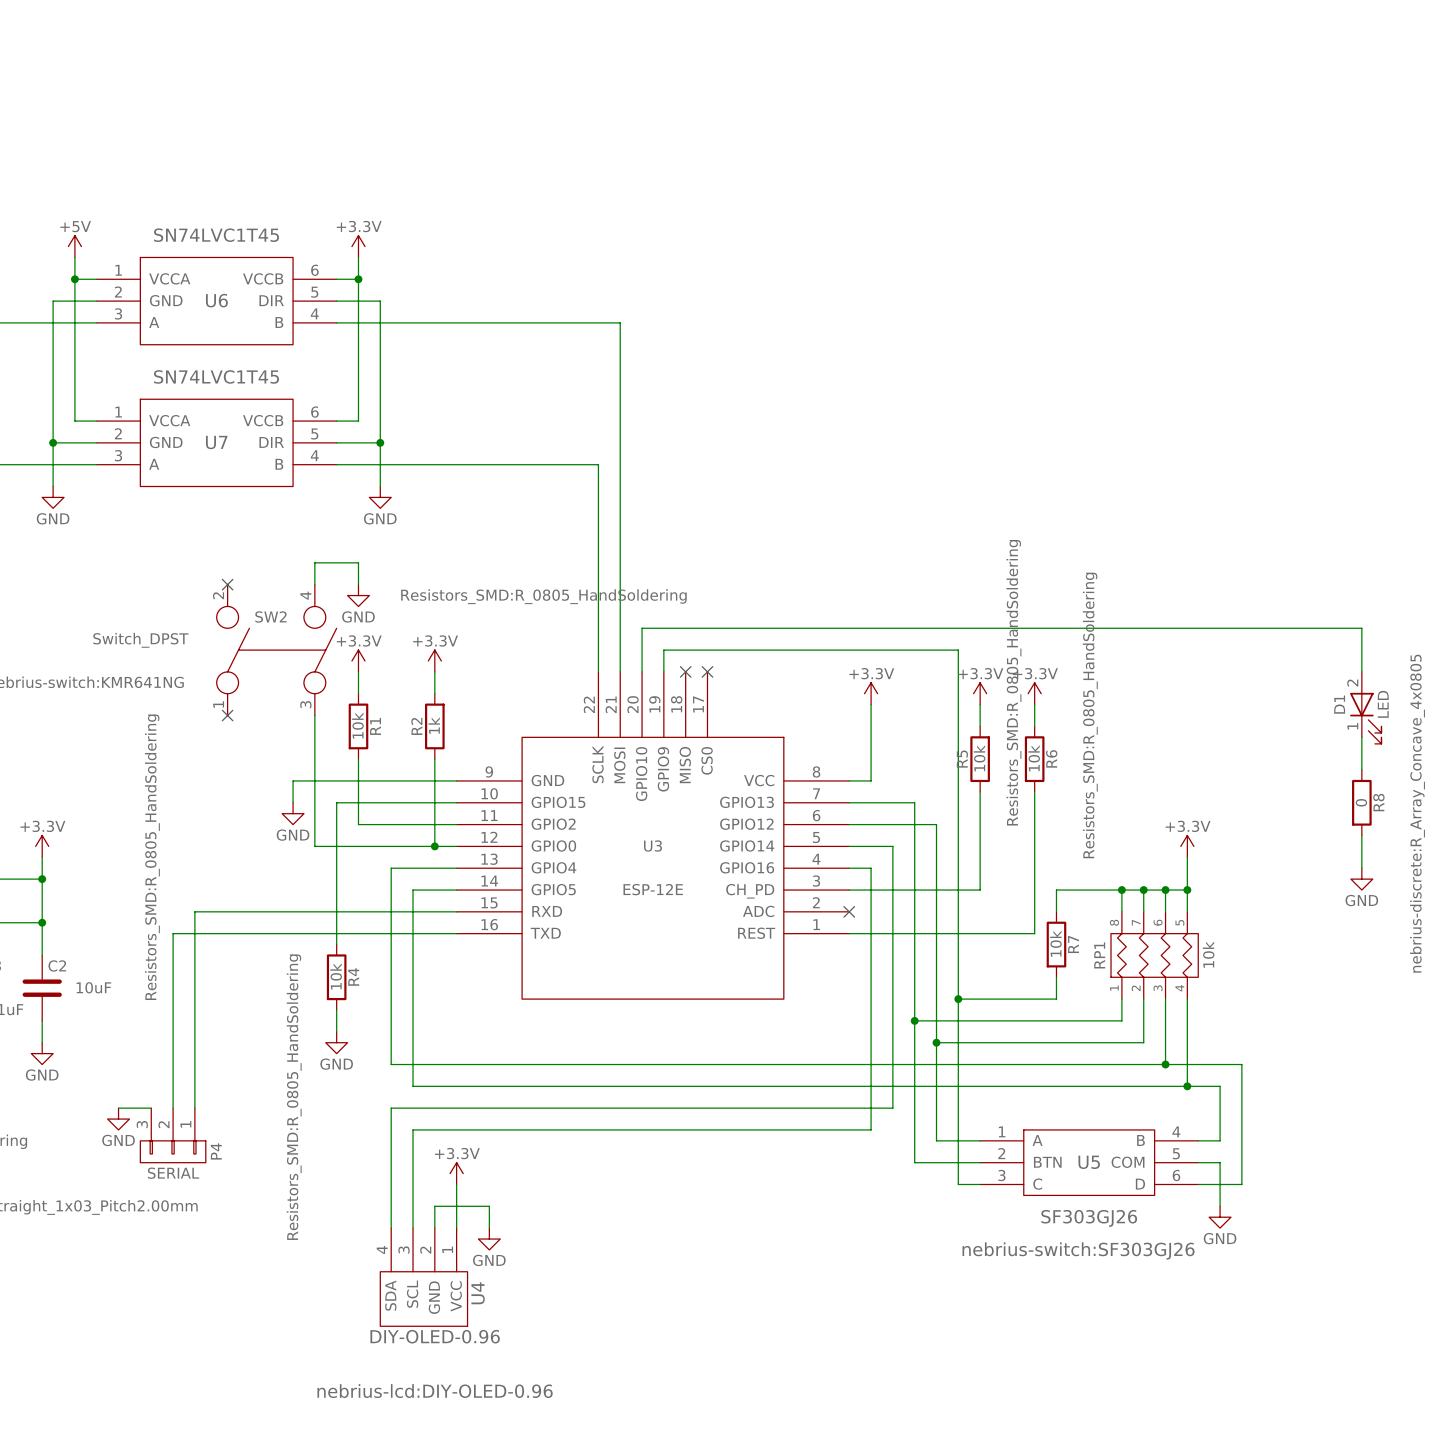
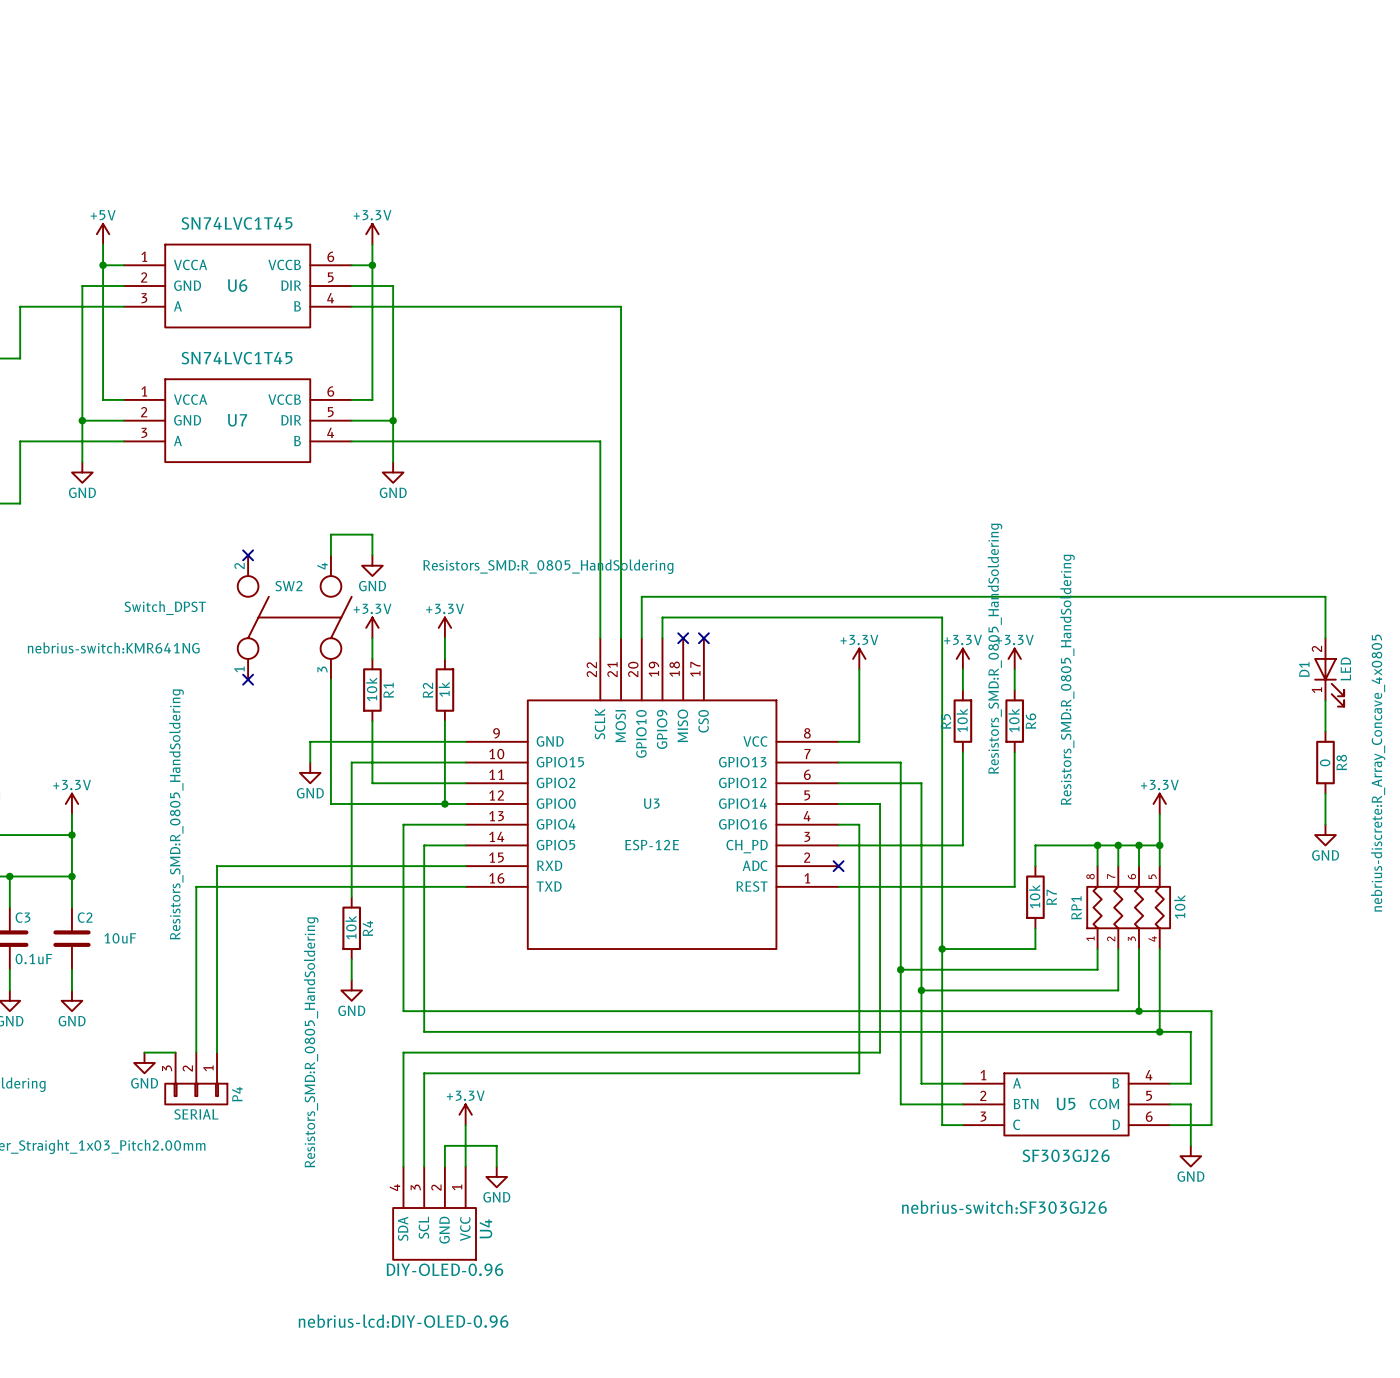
U5 text position: nebrius-switch:SF303GJ26 (1078, 1250) -> nebrius-switch:SF303GJ26 (1004, 1207)
U4 text position: nebrius-lcd:DIY-OLED-0.96 (435, 1391) -> nebrius-lcd:DIY-OLED-0.96 (403, 1321)

